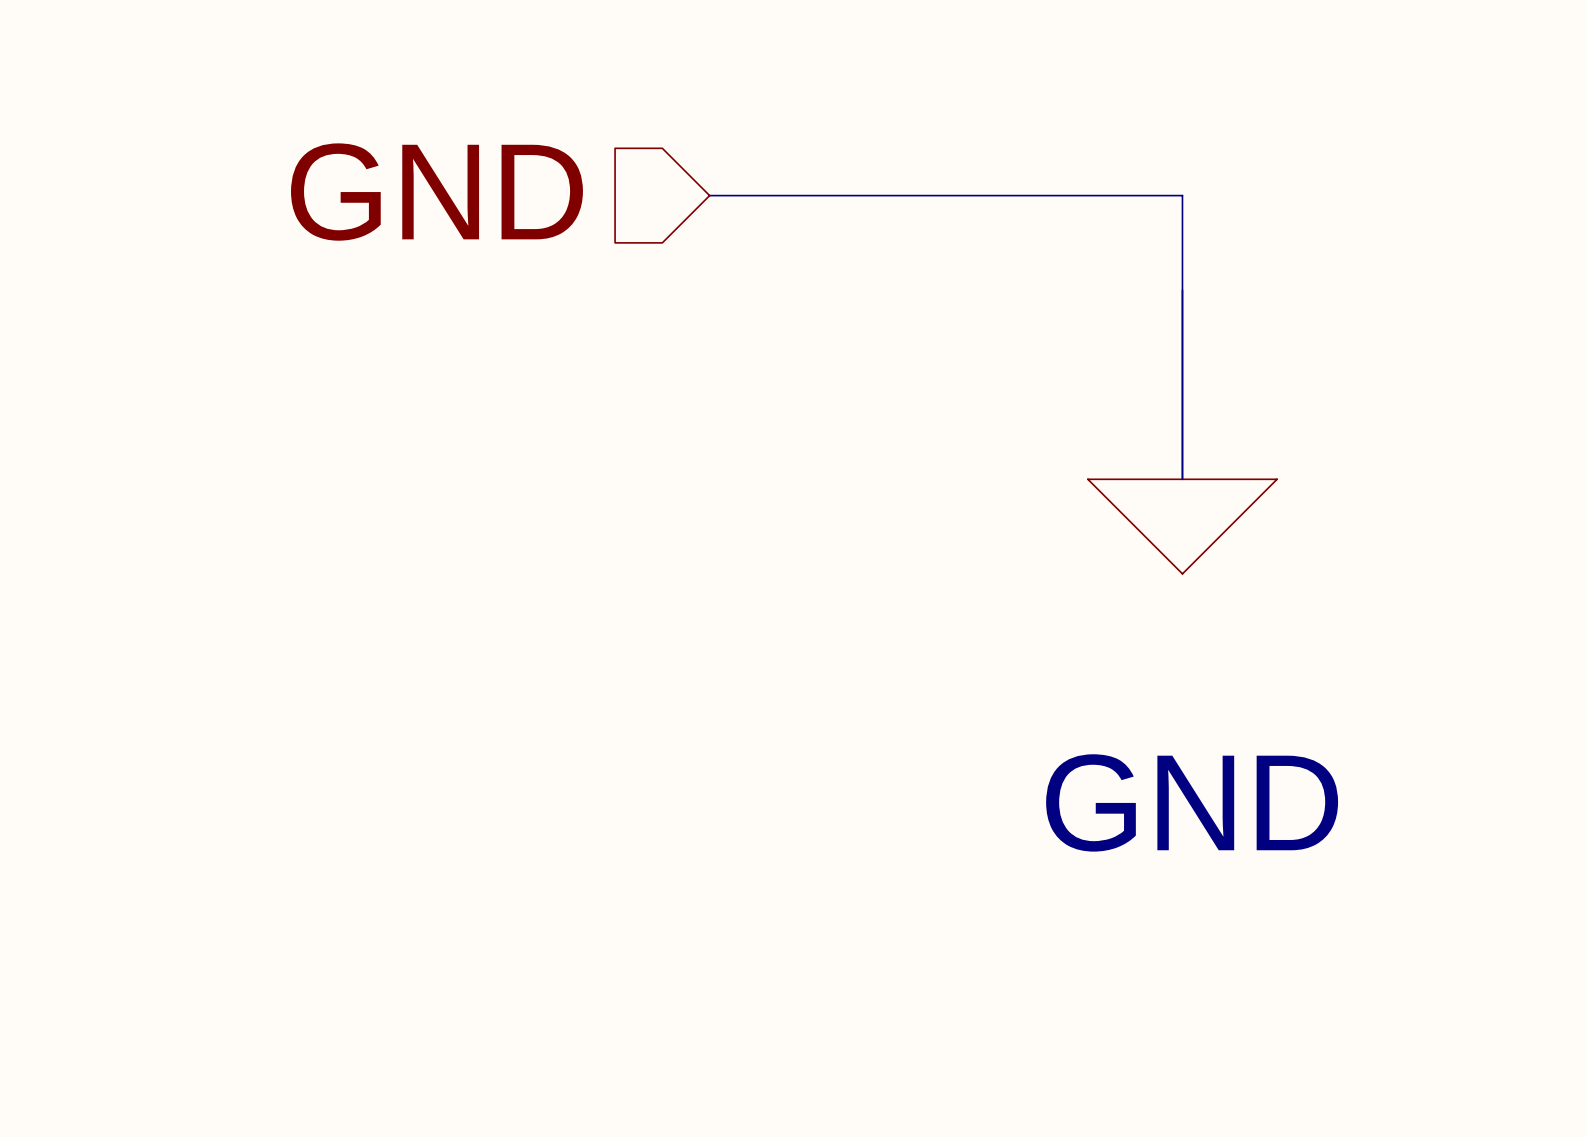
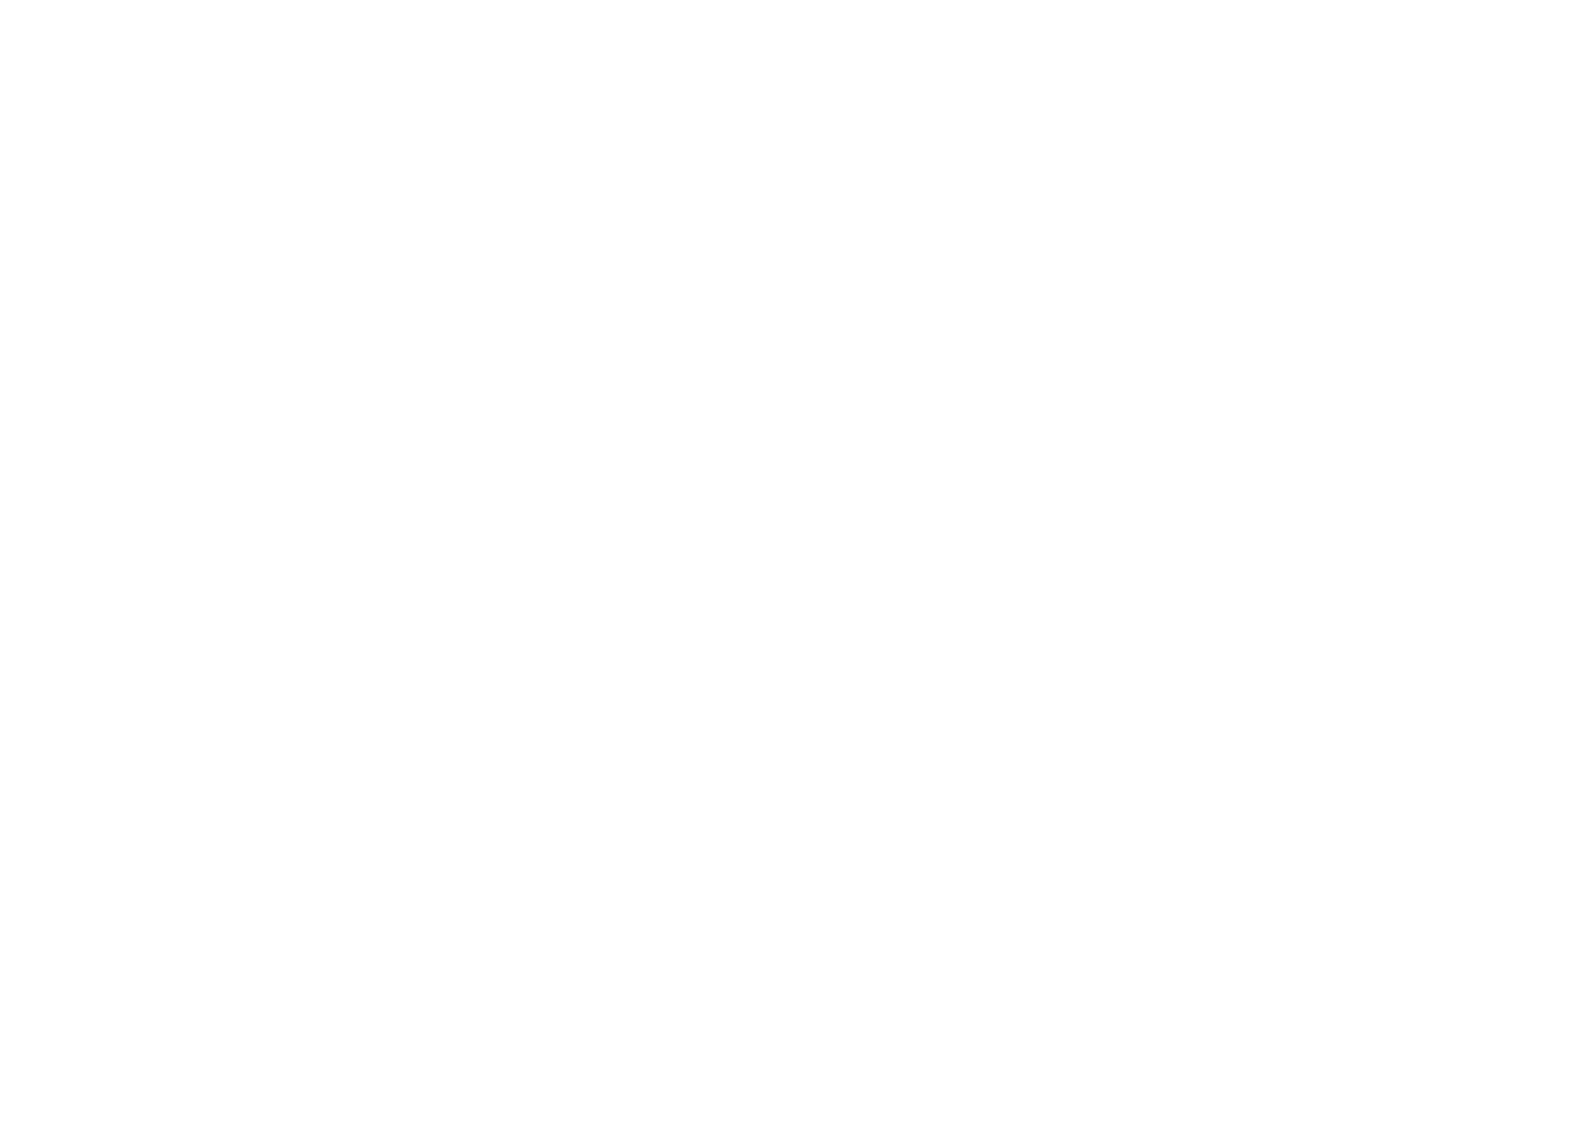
hierarchical label: GND (436, 192) -> none
wire: (709, 195) (1182, 195) (1182, 479) -> none
power symbol: GND (1182, 432) -> none

